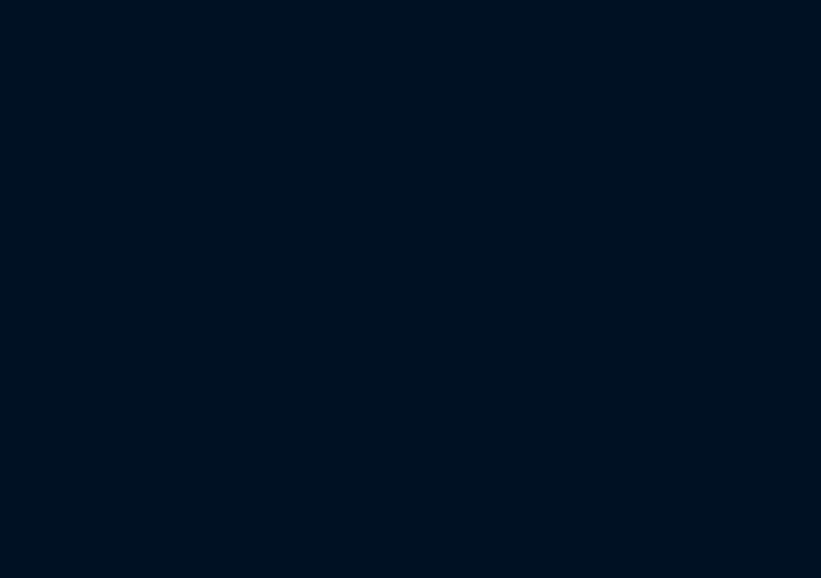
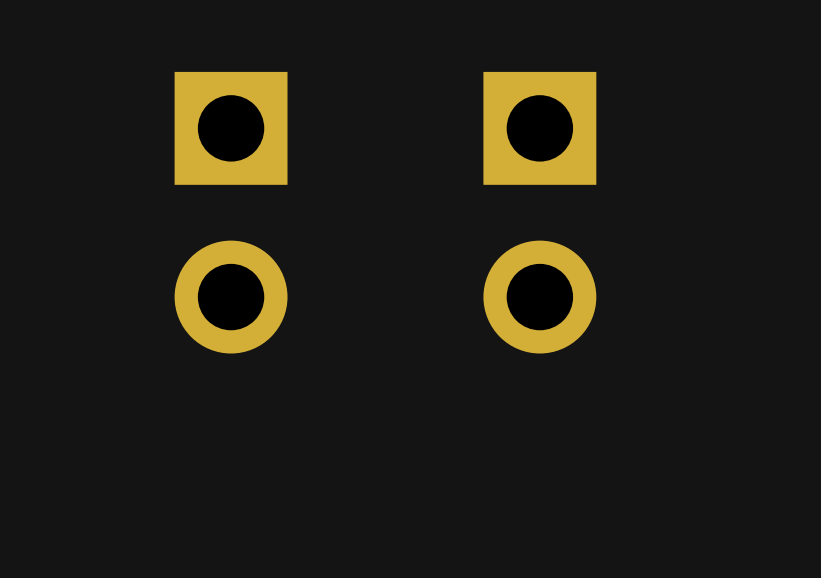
part: none -> (231, 212)
part: none -> (539, 212)

